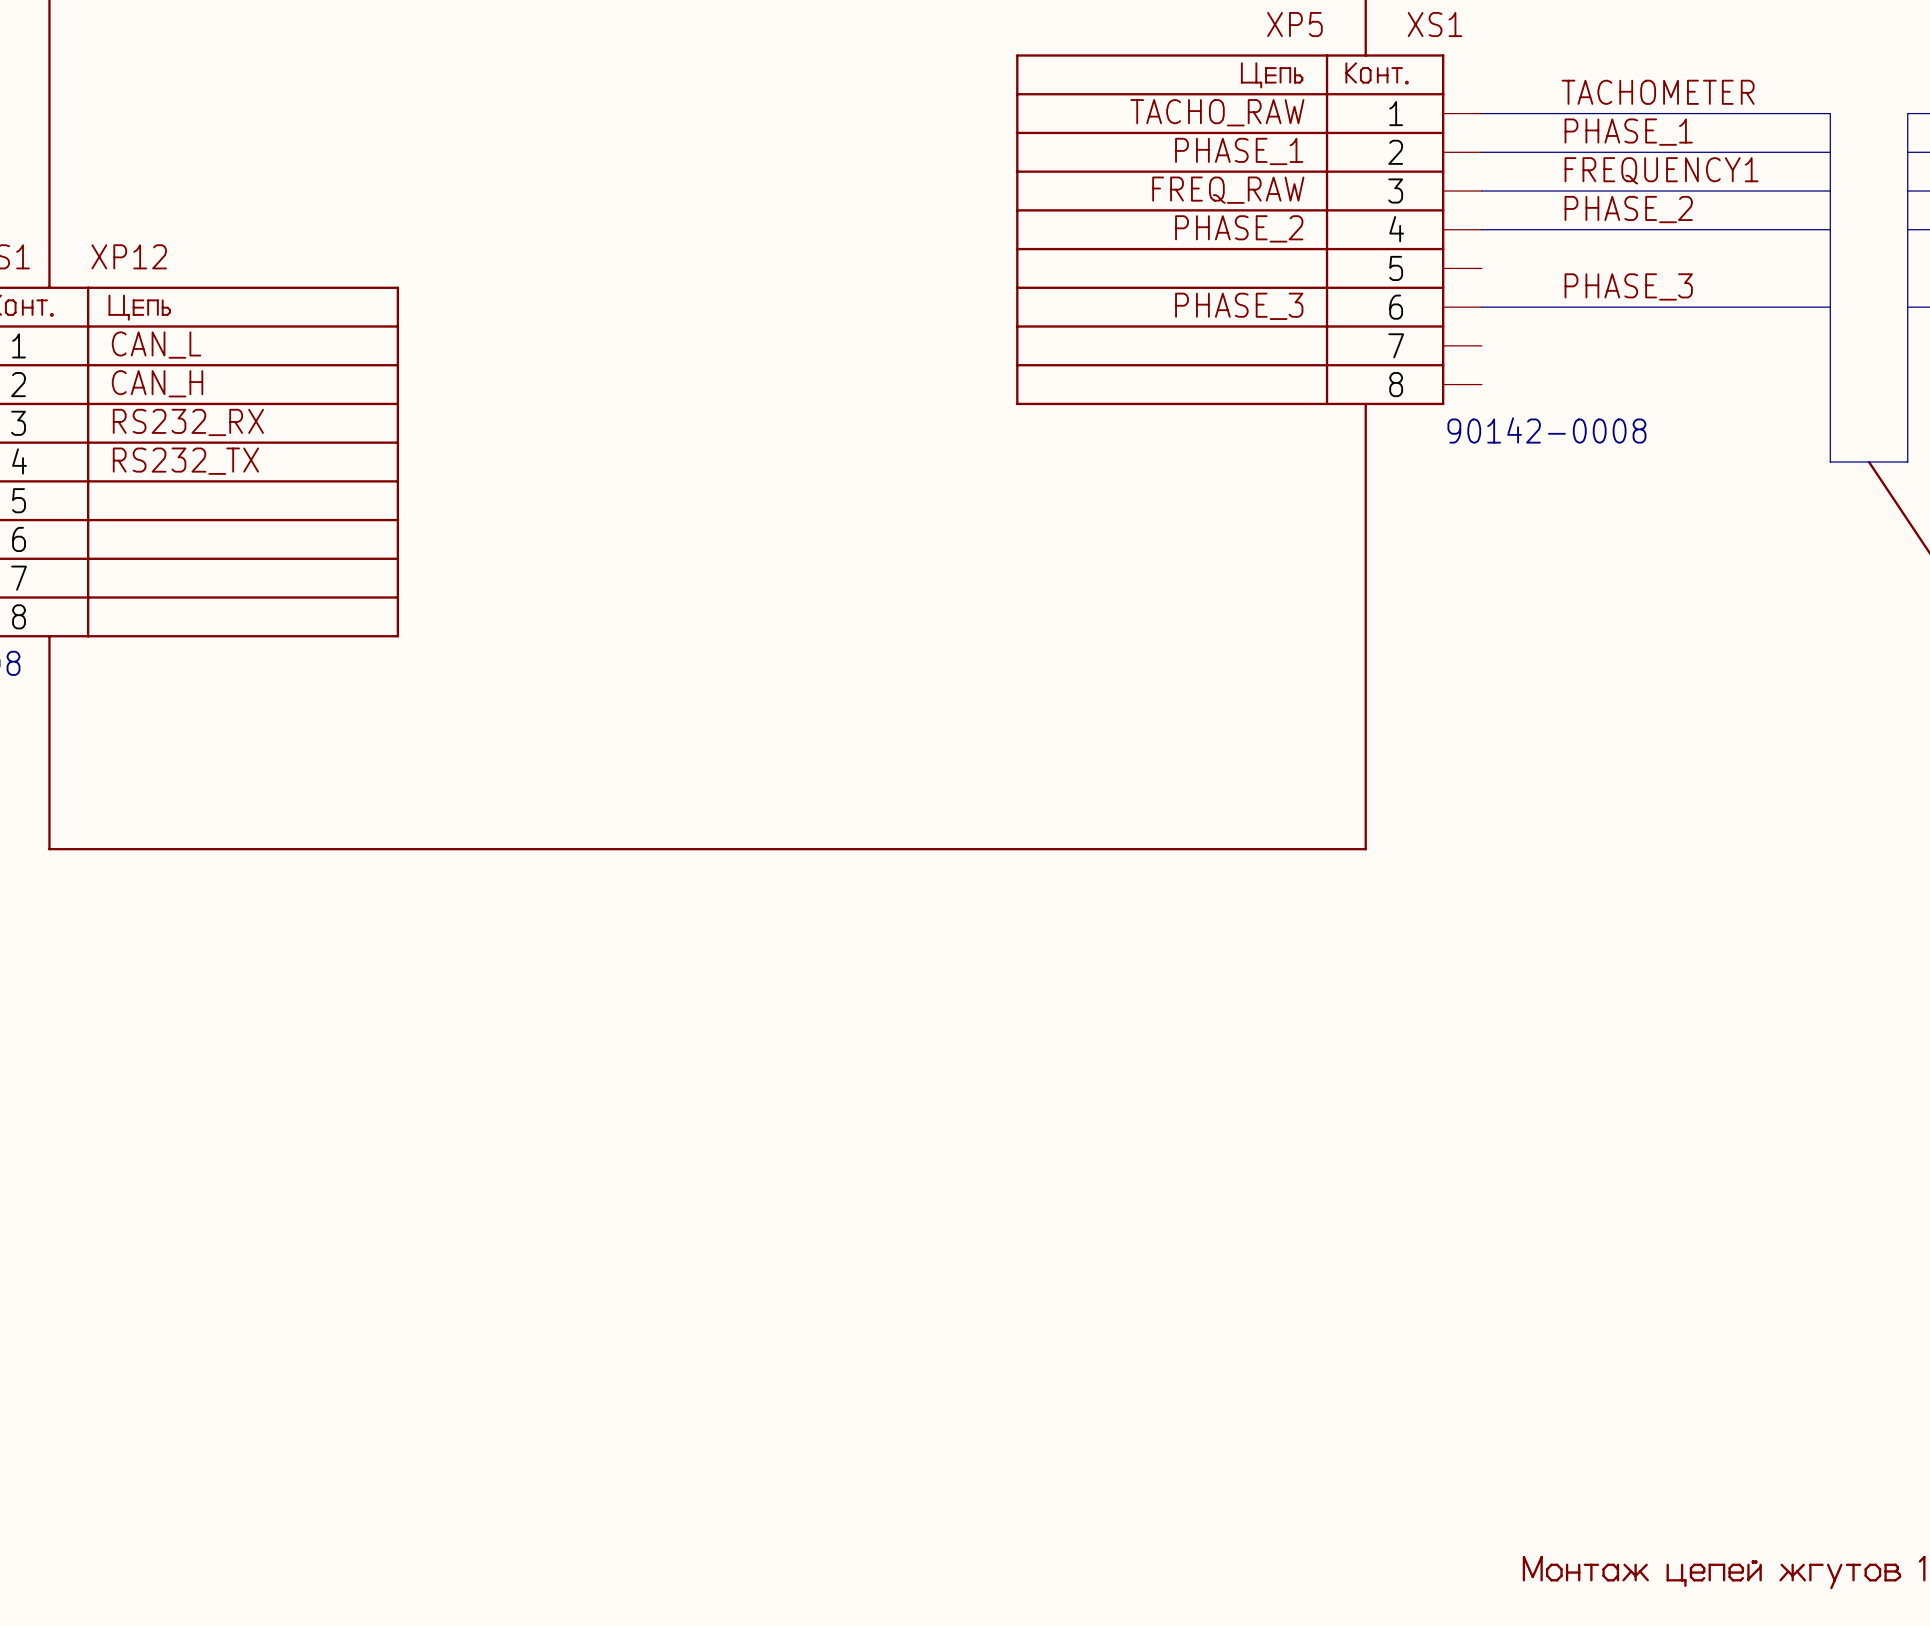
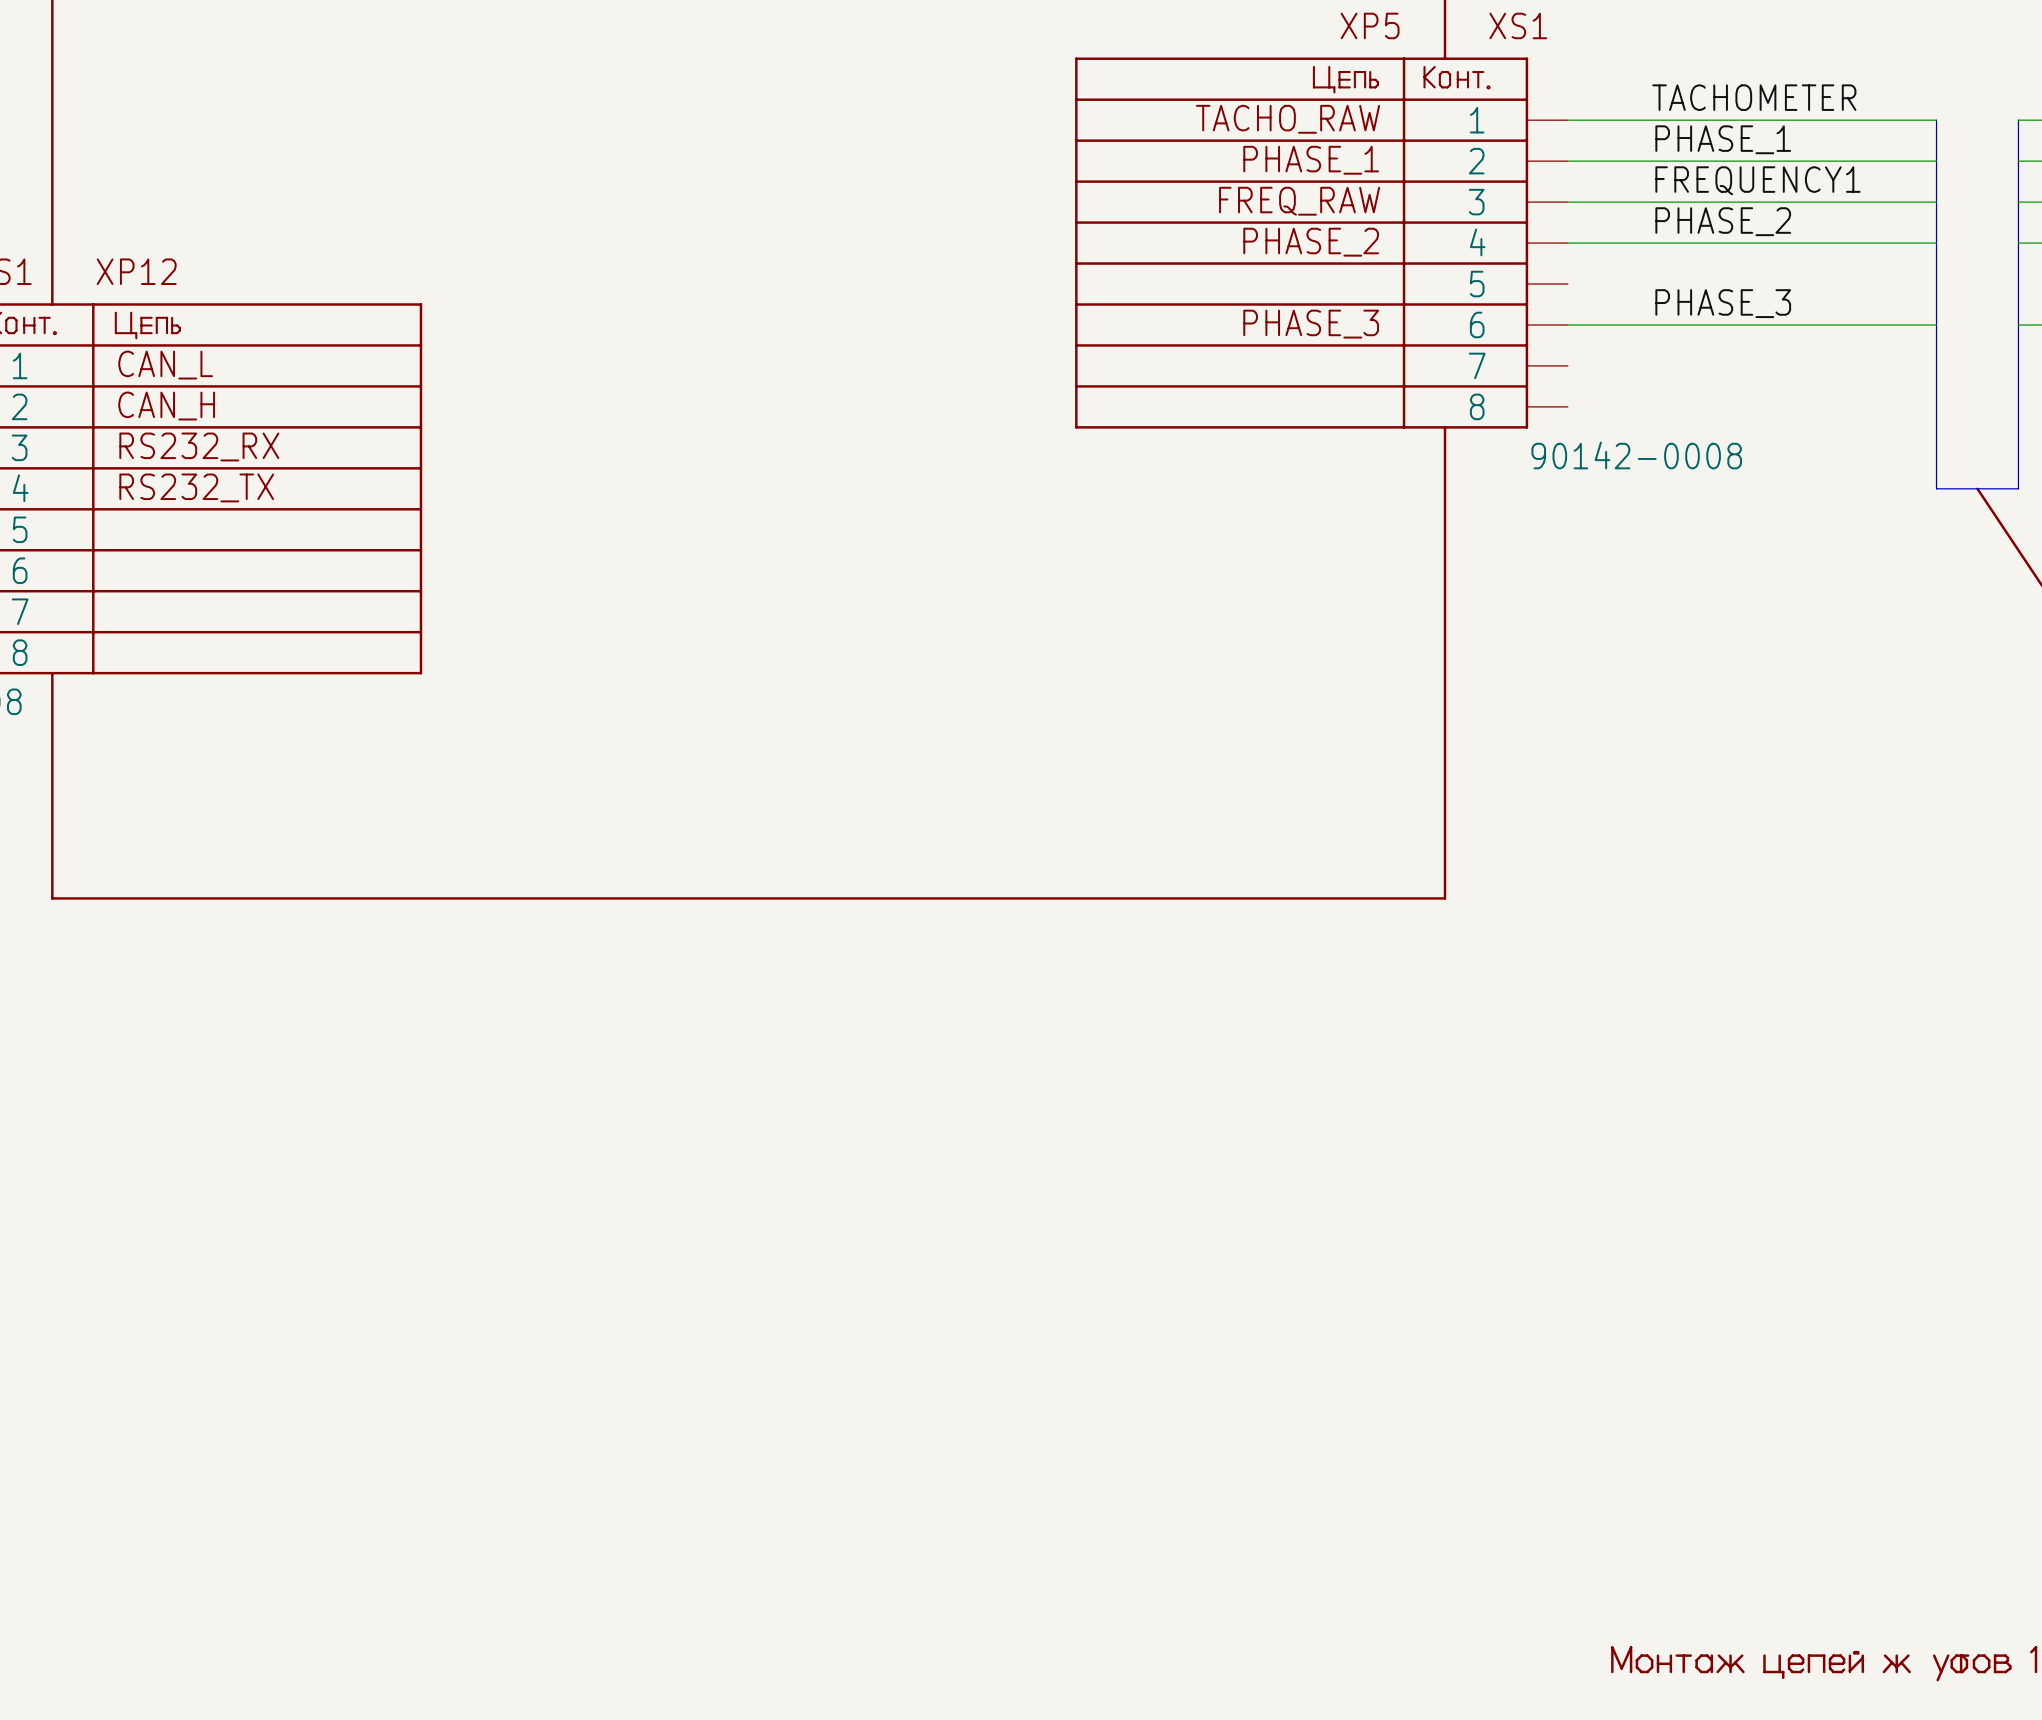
line: (1822, 1564) (1810, 1564) (1810, 1580) -> none
line: (1846, 1564) (1849, 1564) -> (1962, 1655) (1966, 1660) (1966, 1667) (1962, 1672) (1956, 1672) (1951, 1667) (1951, 1660) (1956, 1655)

